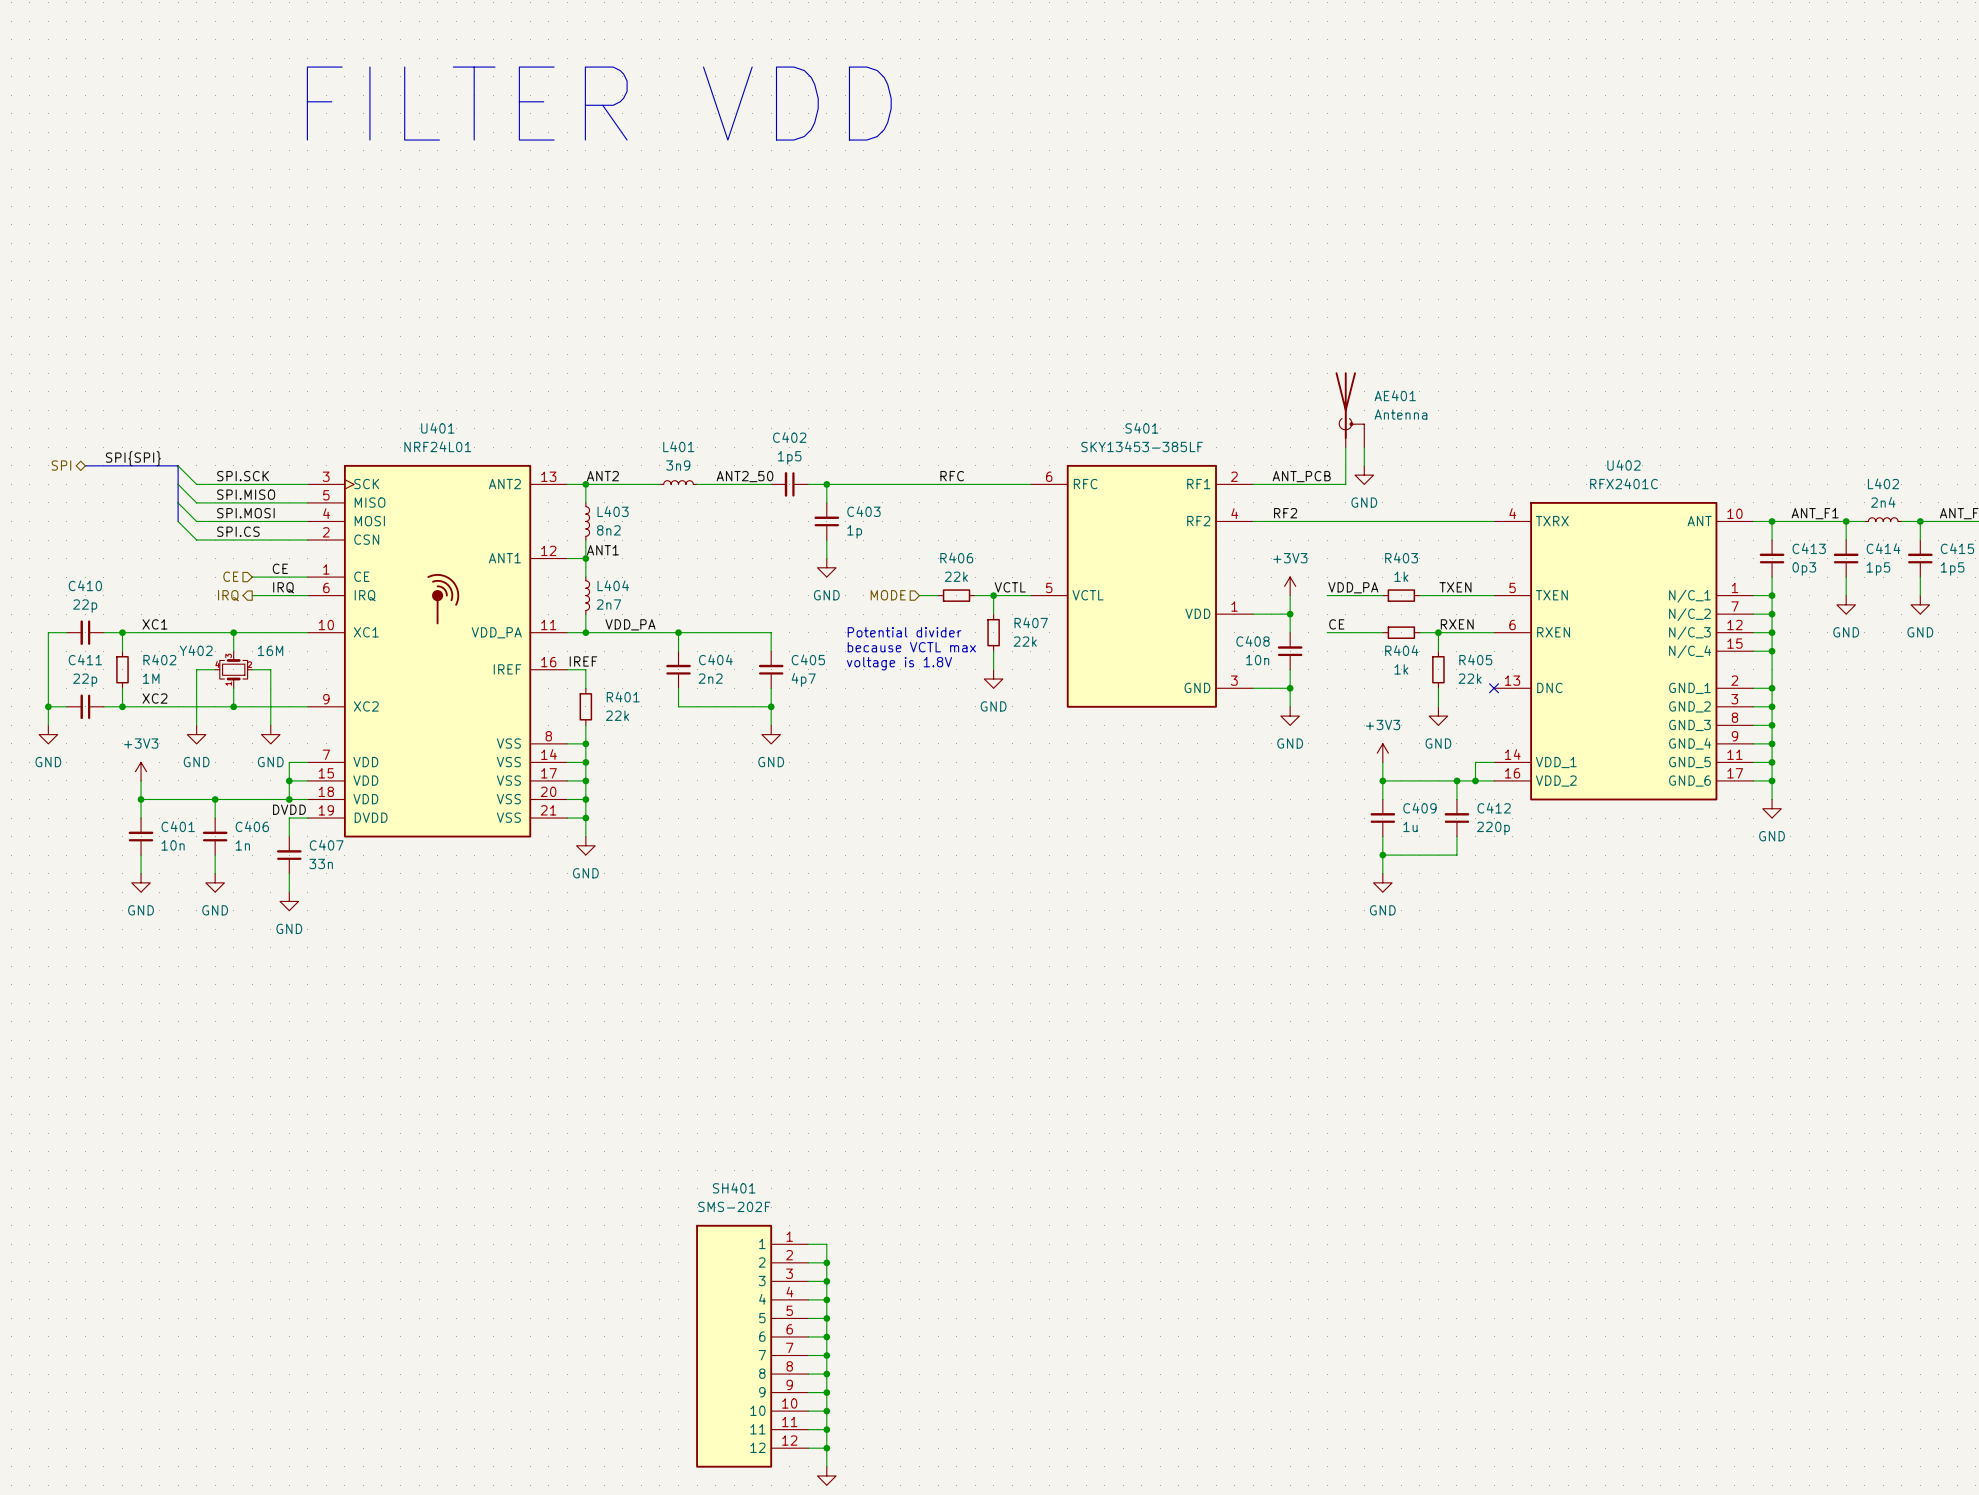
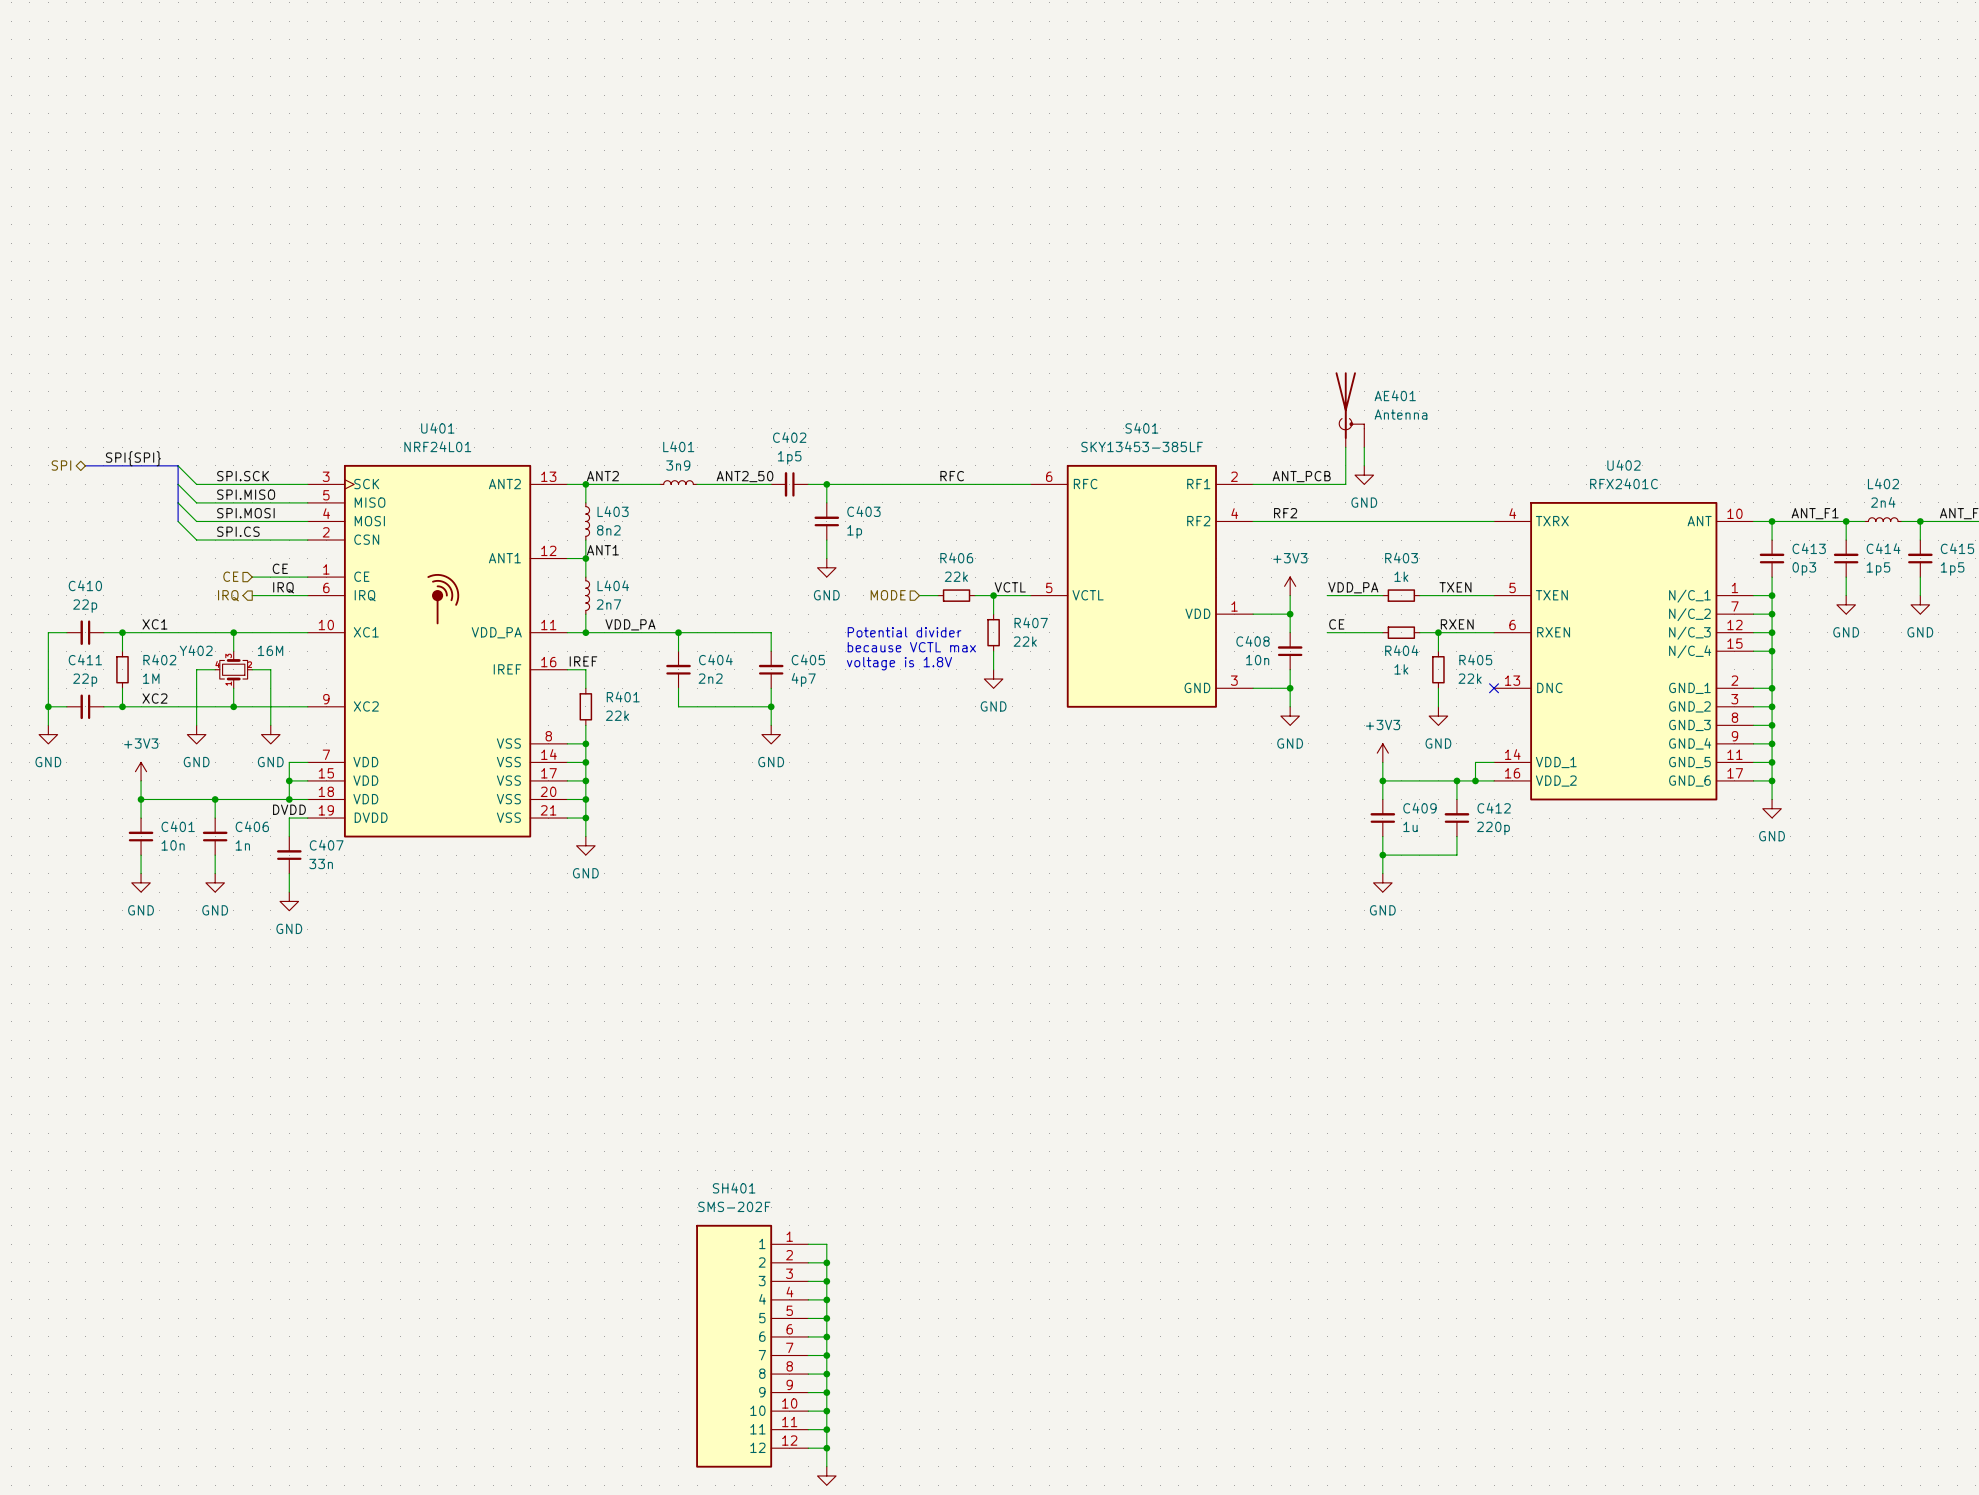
text: FILTER VDD (599, 103) -> none

